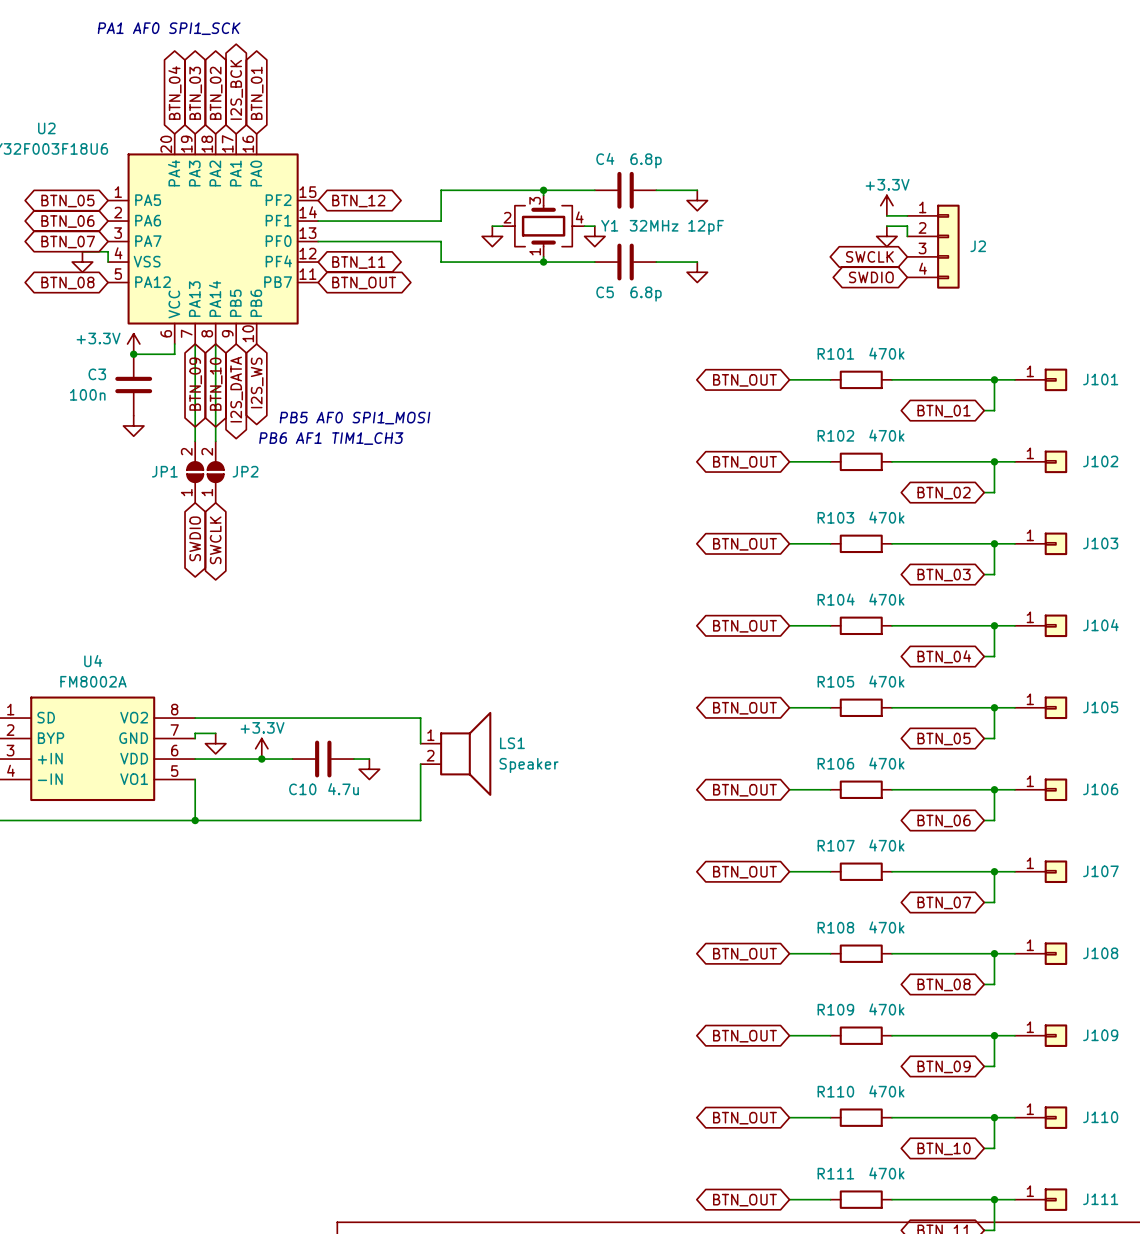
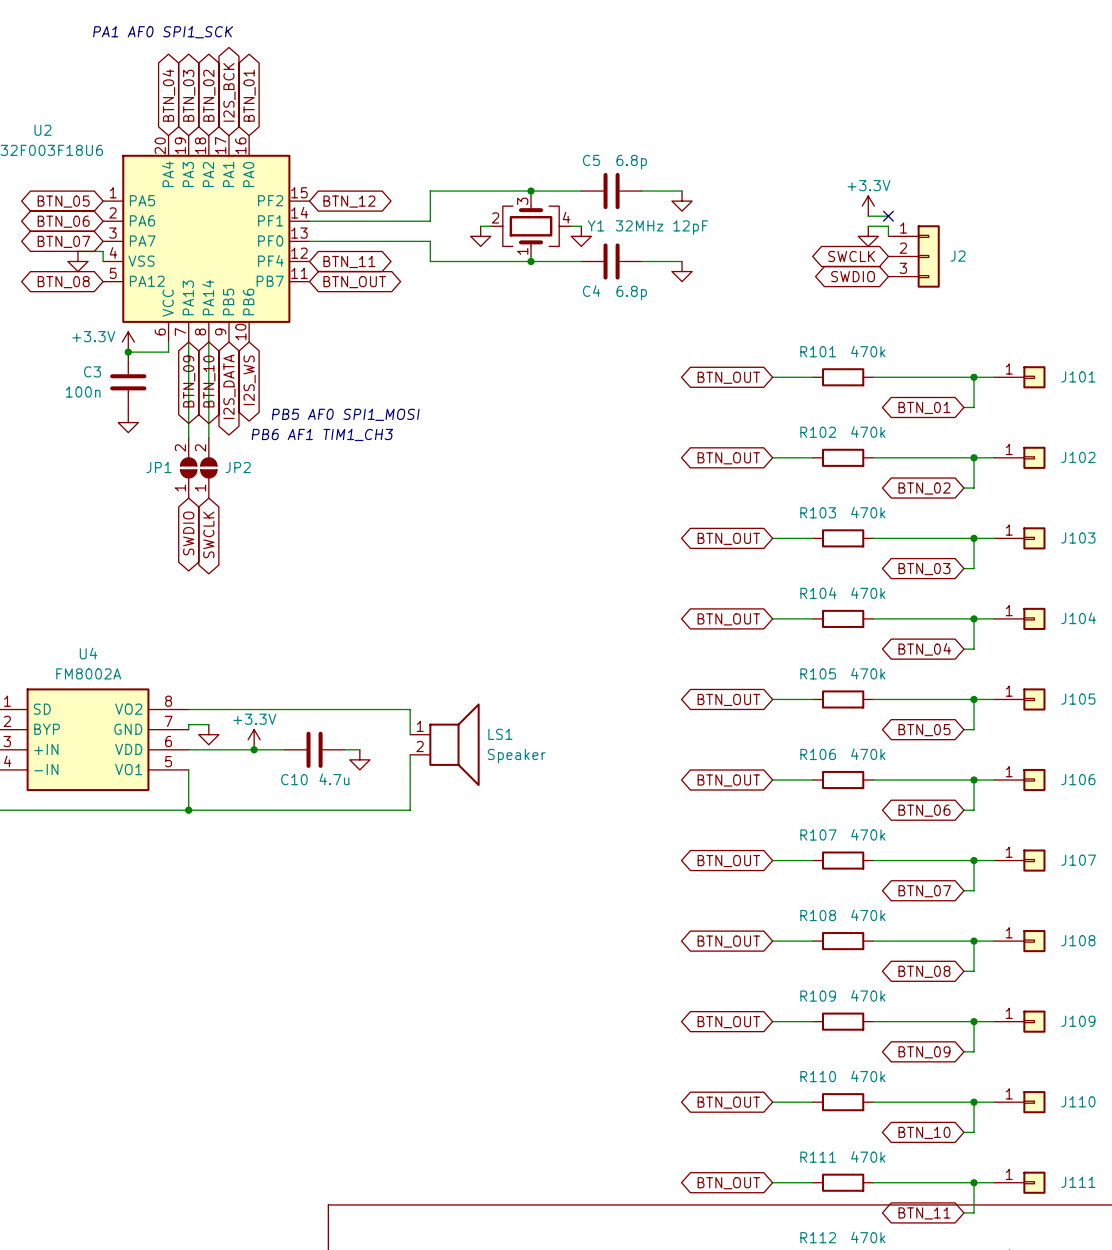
C4 name: C4 (605, 158) -> C5 (591, 160)
J2 symbol: [907, 204, 960, 289] -> [888, 225, 940, 288]
no-connect mark: none -> (888, 216)
C5 name: C5 (605, 292) -> C4 (591, 291)

